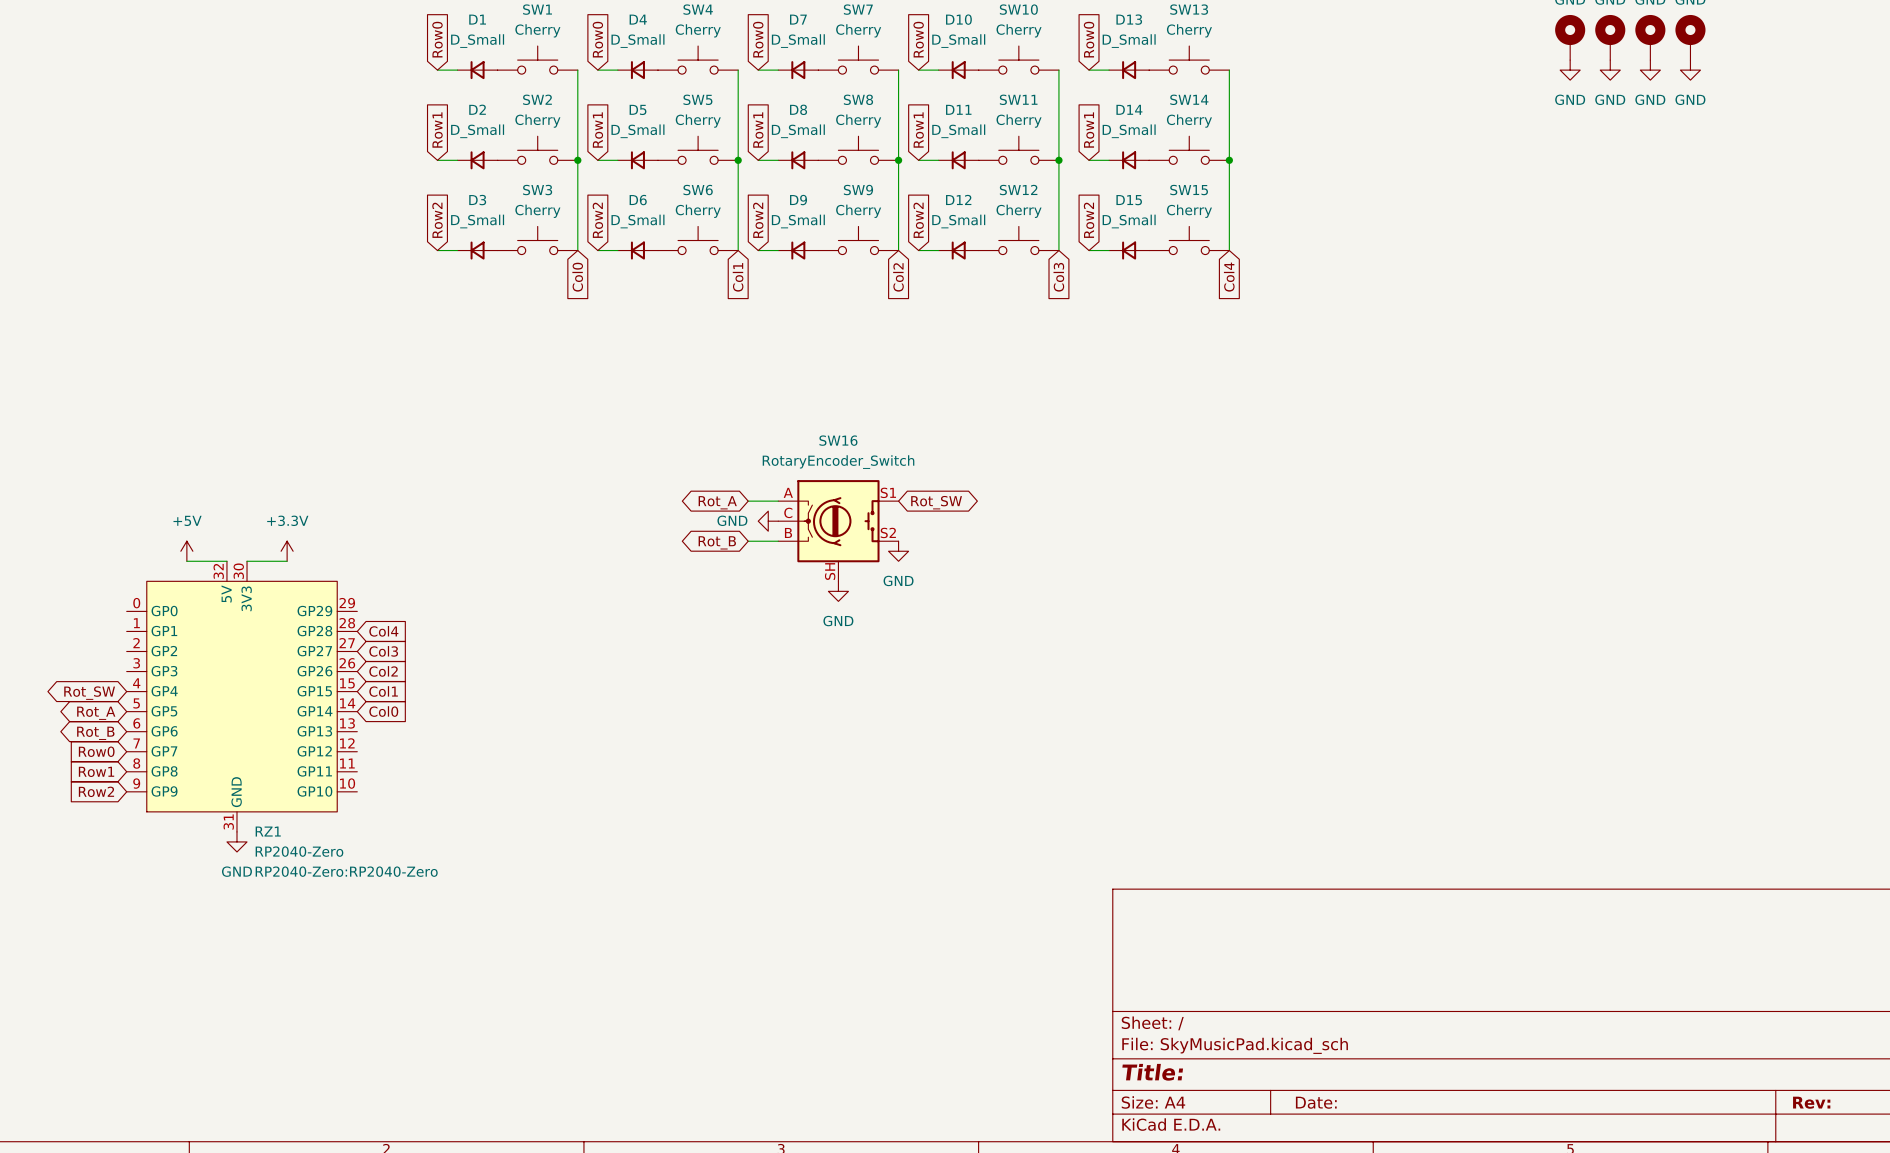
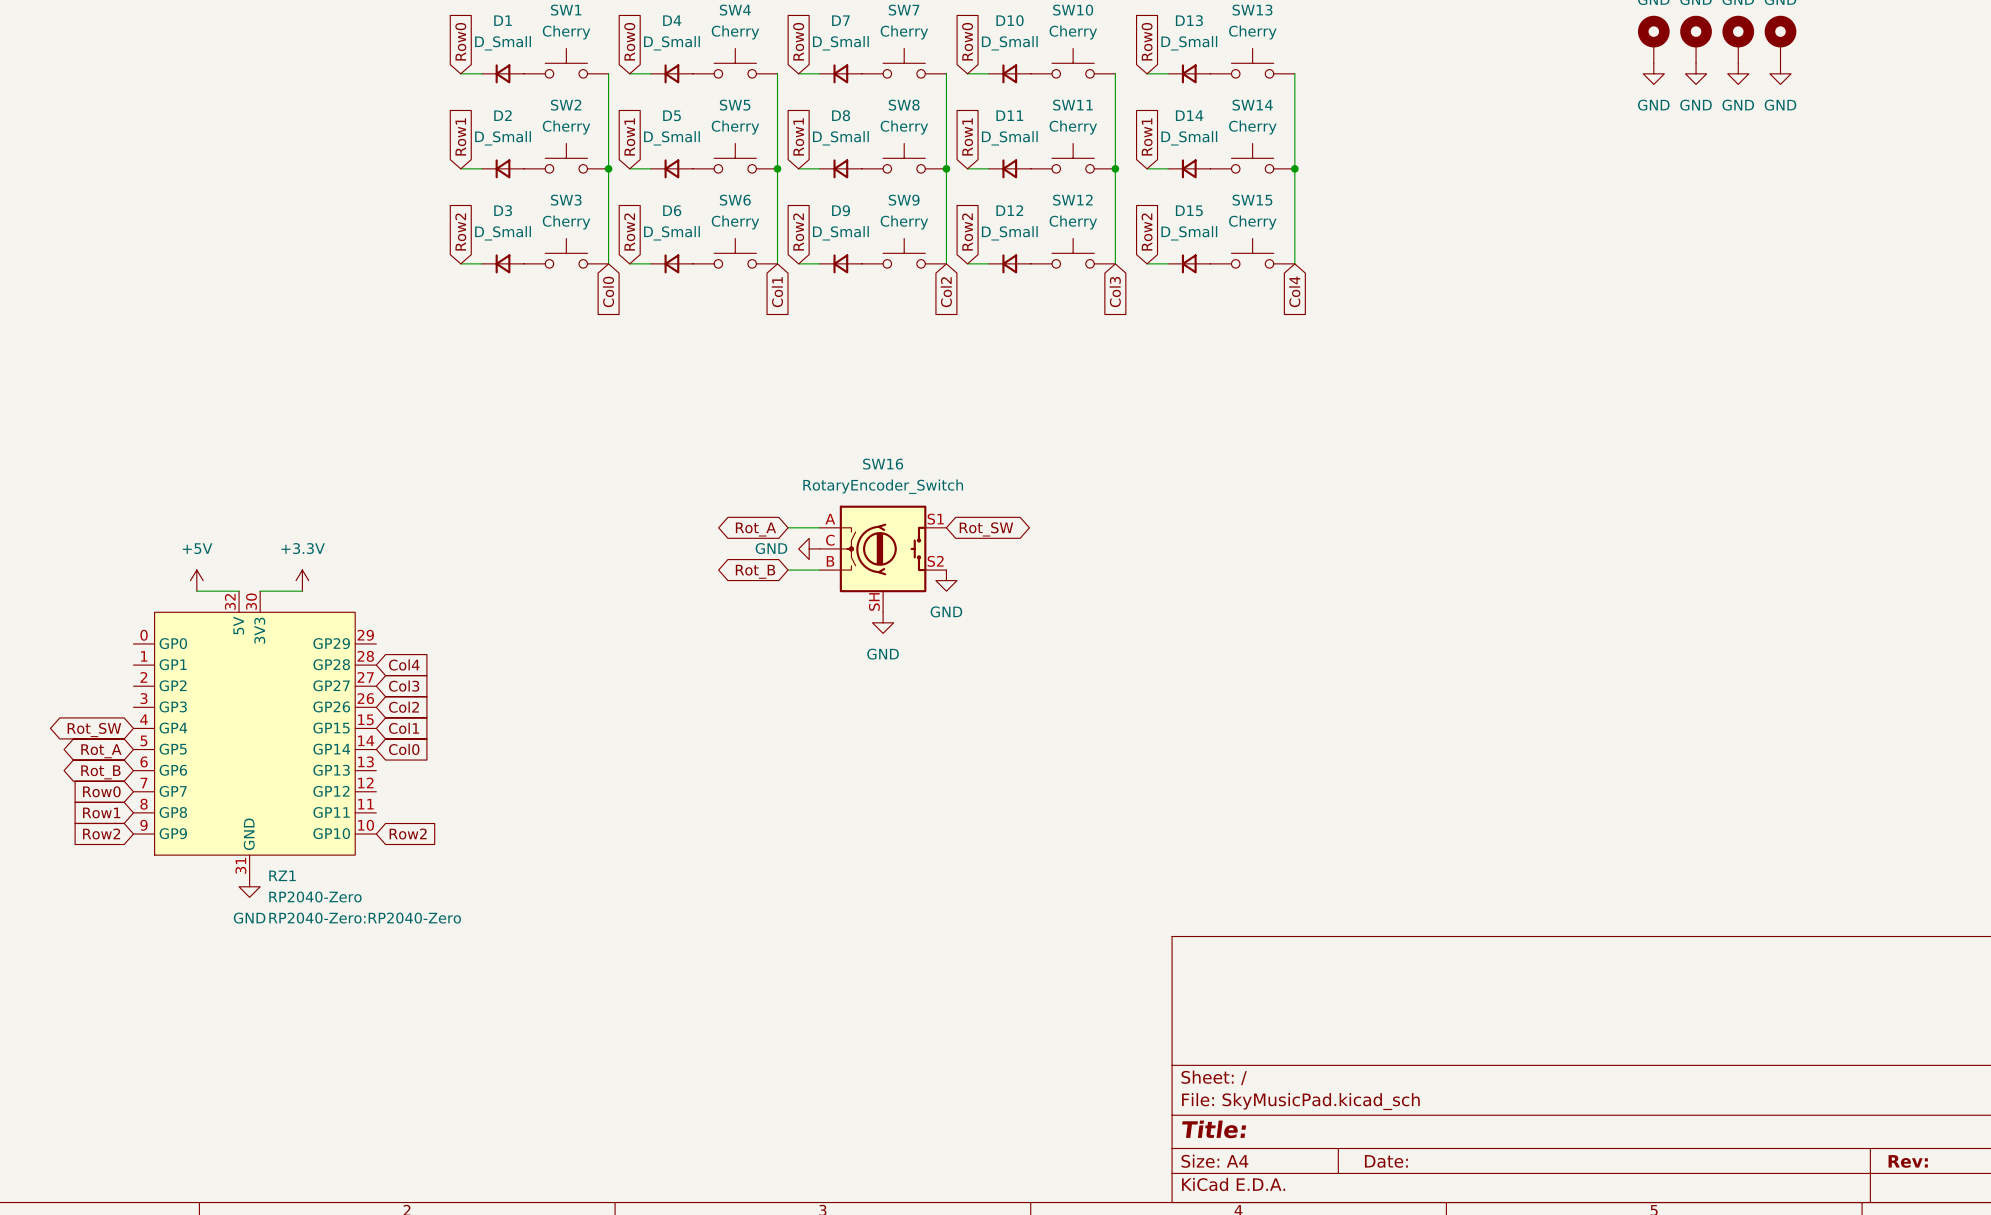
global label: none -> Row2 (408, 834)

